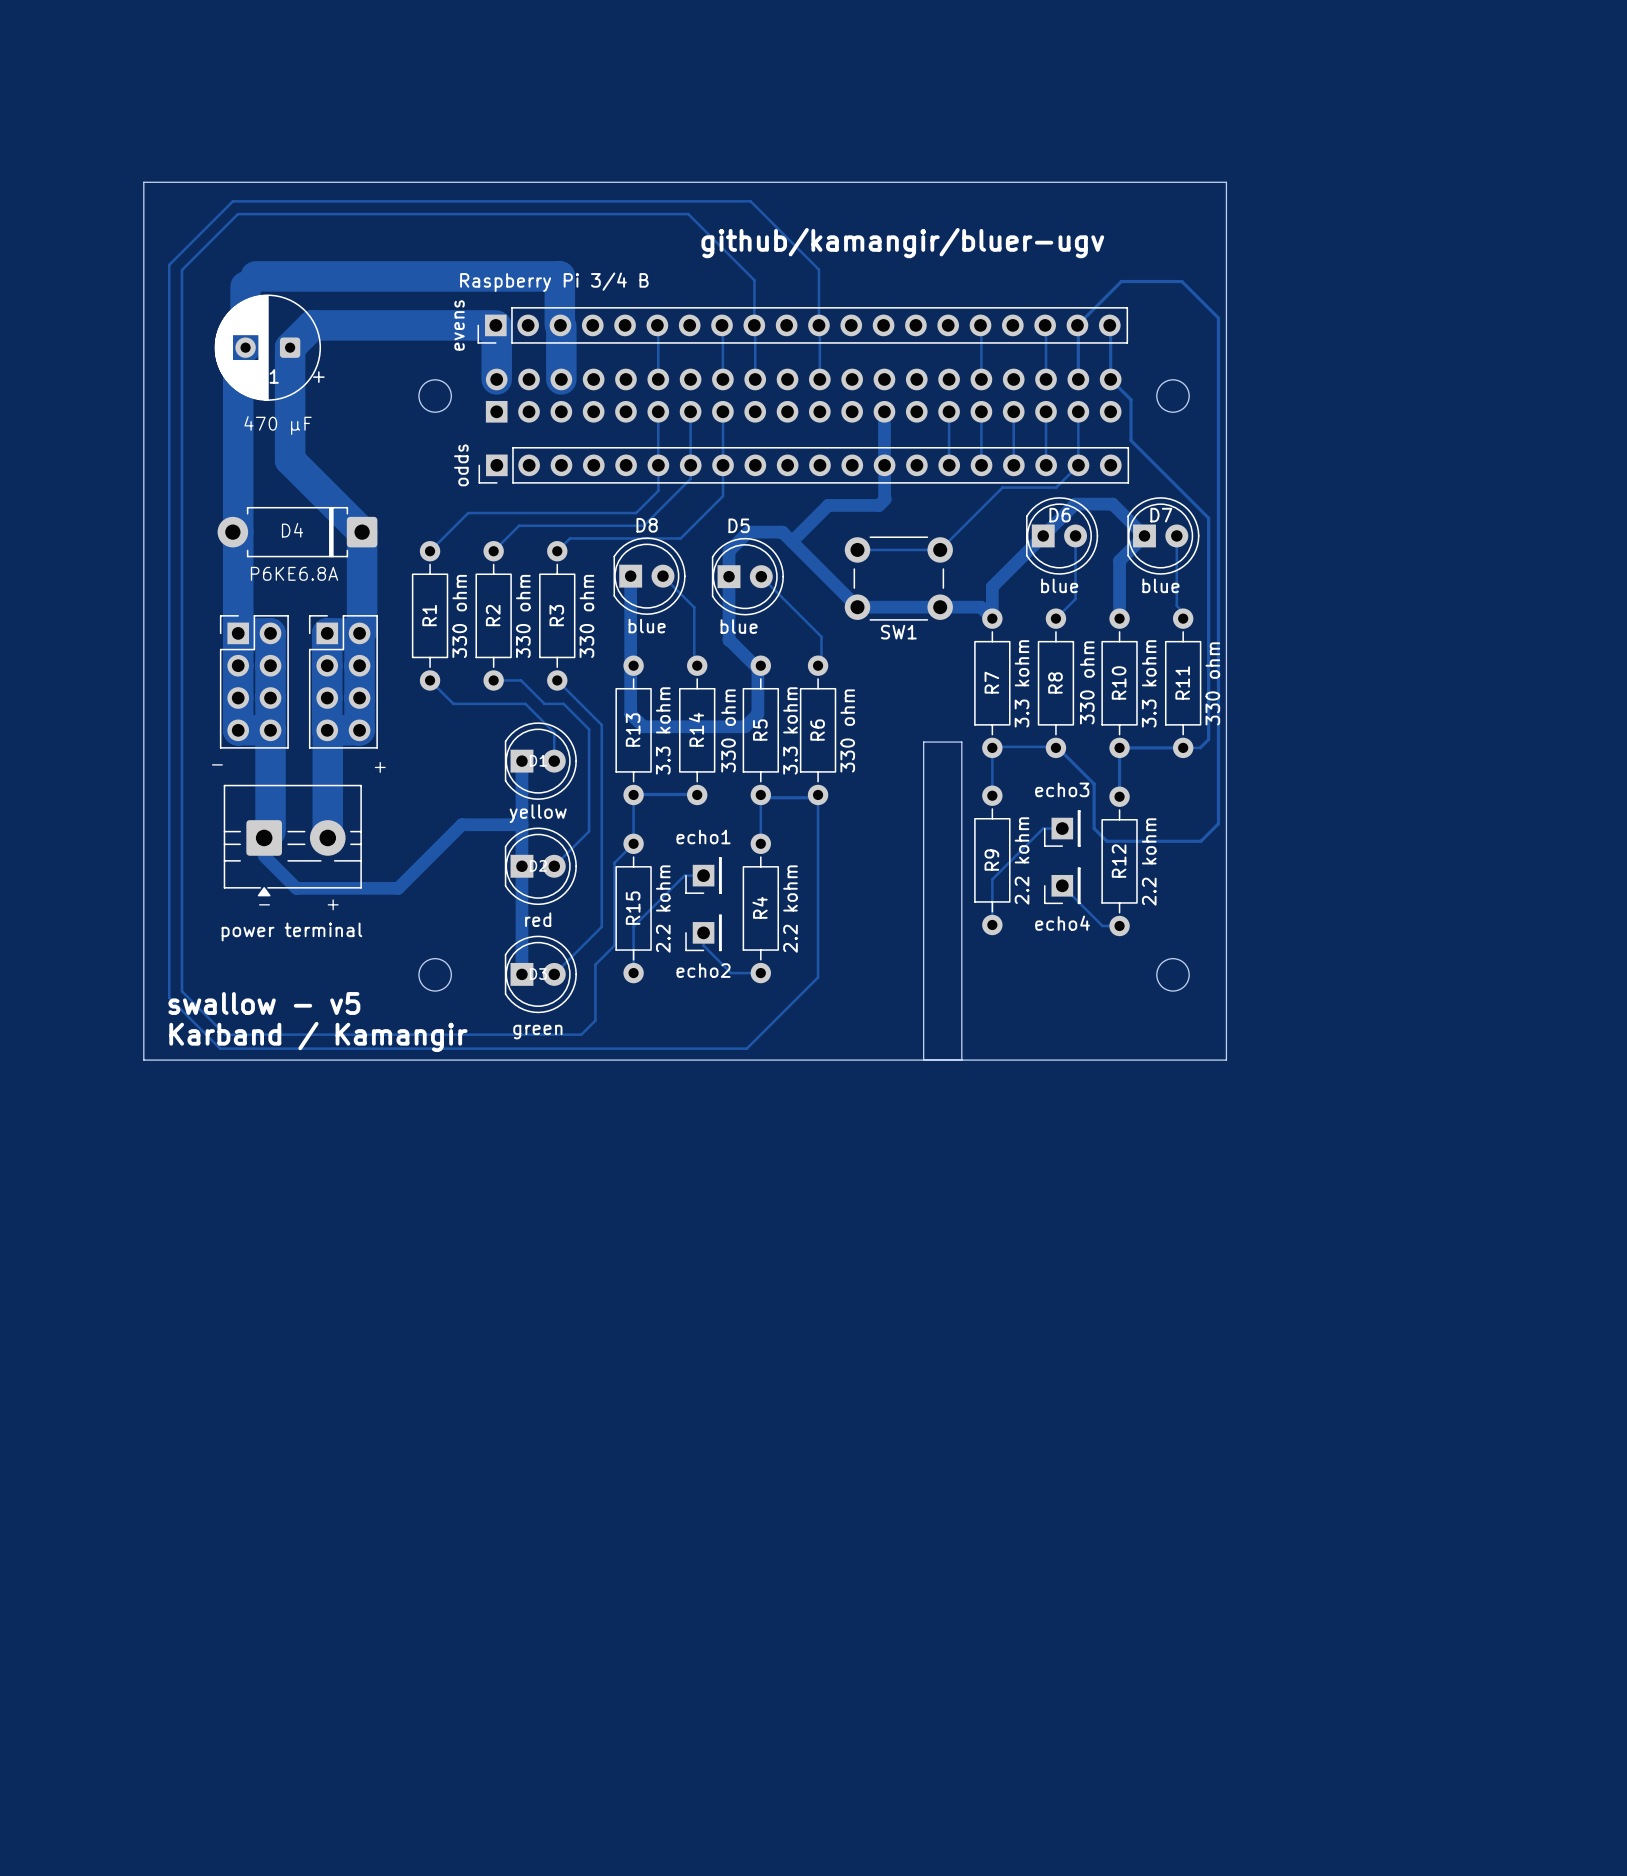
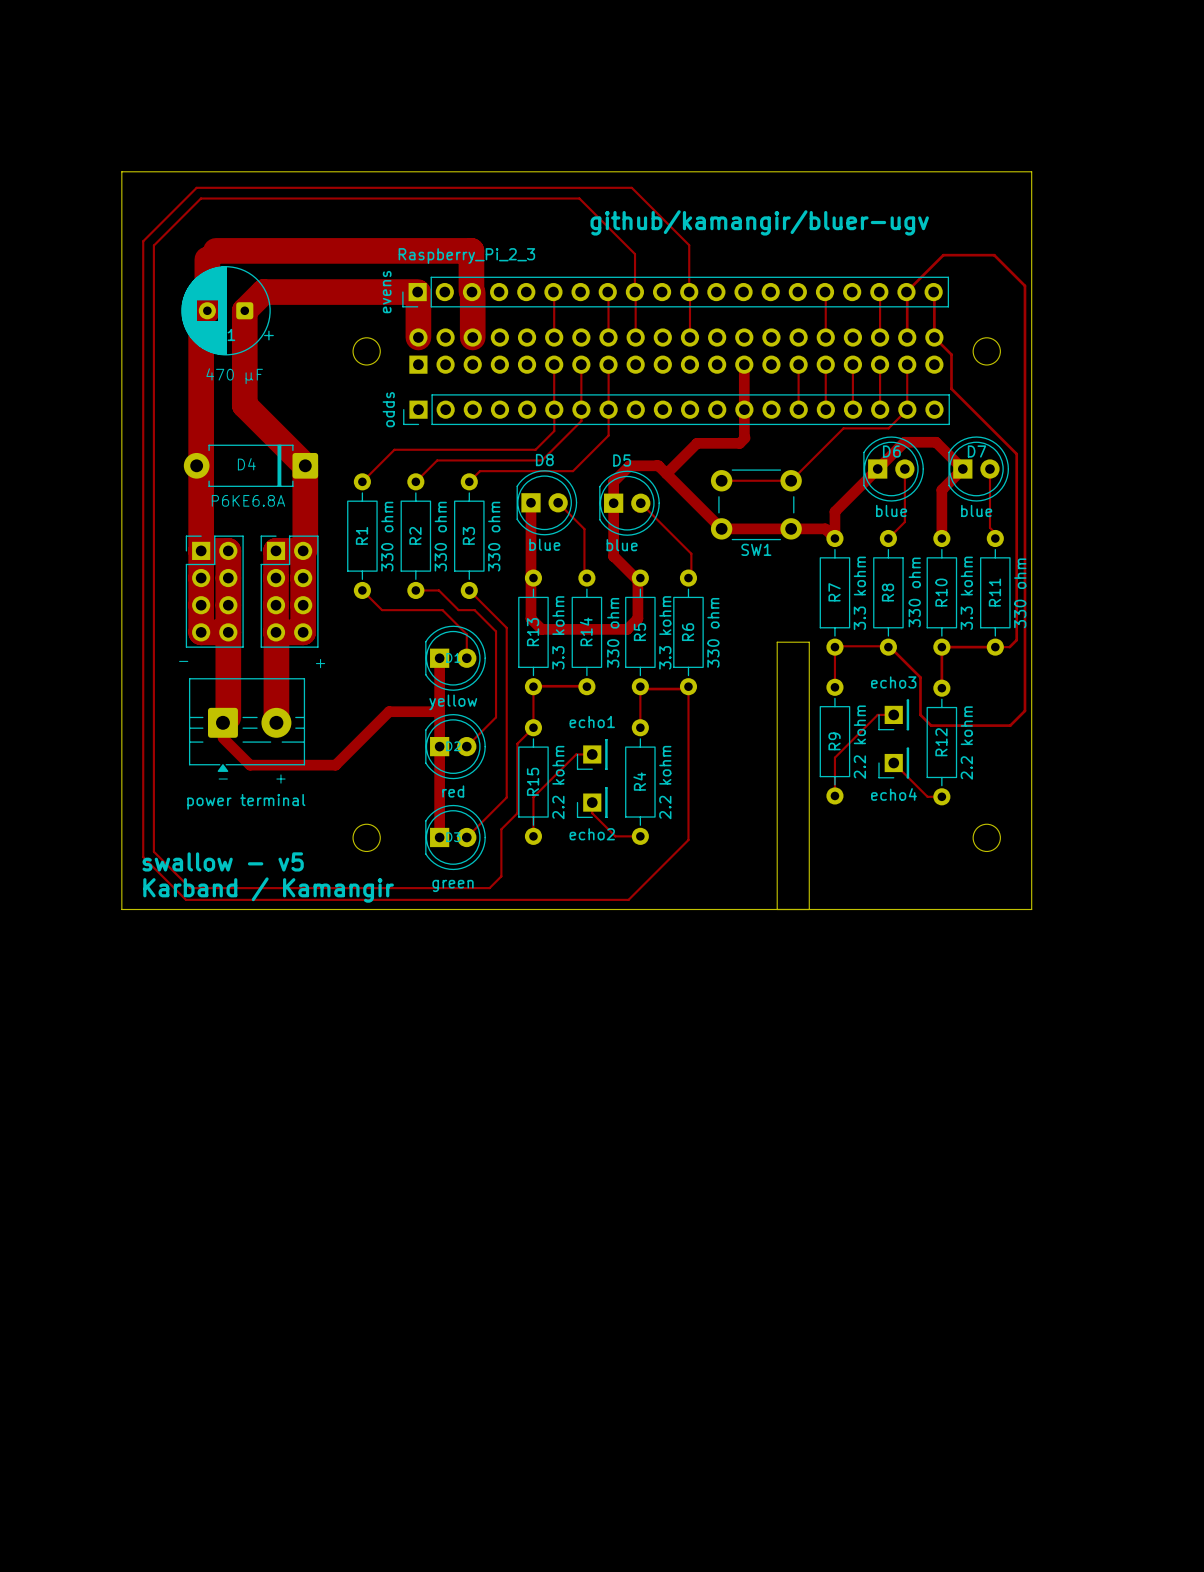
part value: Raspberry Pi 3/4 B (554, 282) -> Raspberry_Pi_2_3 (466, 256)

